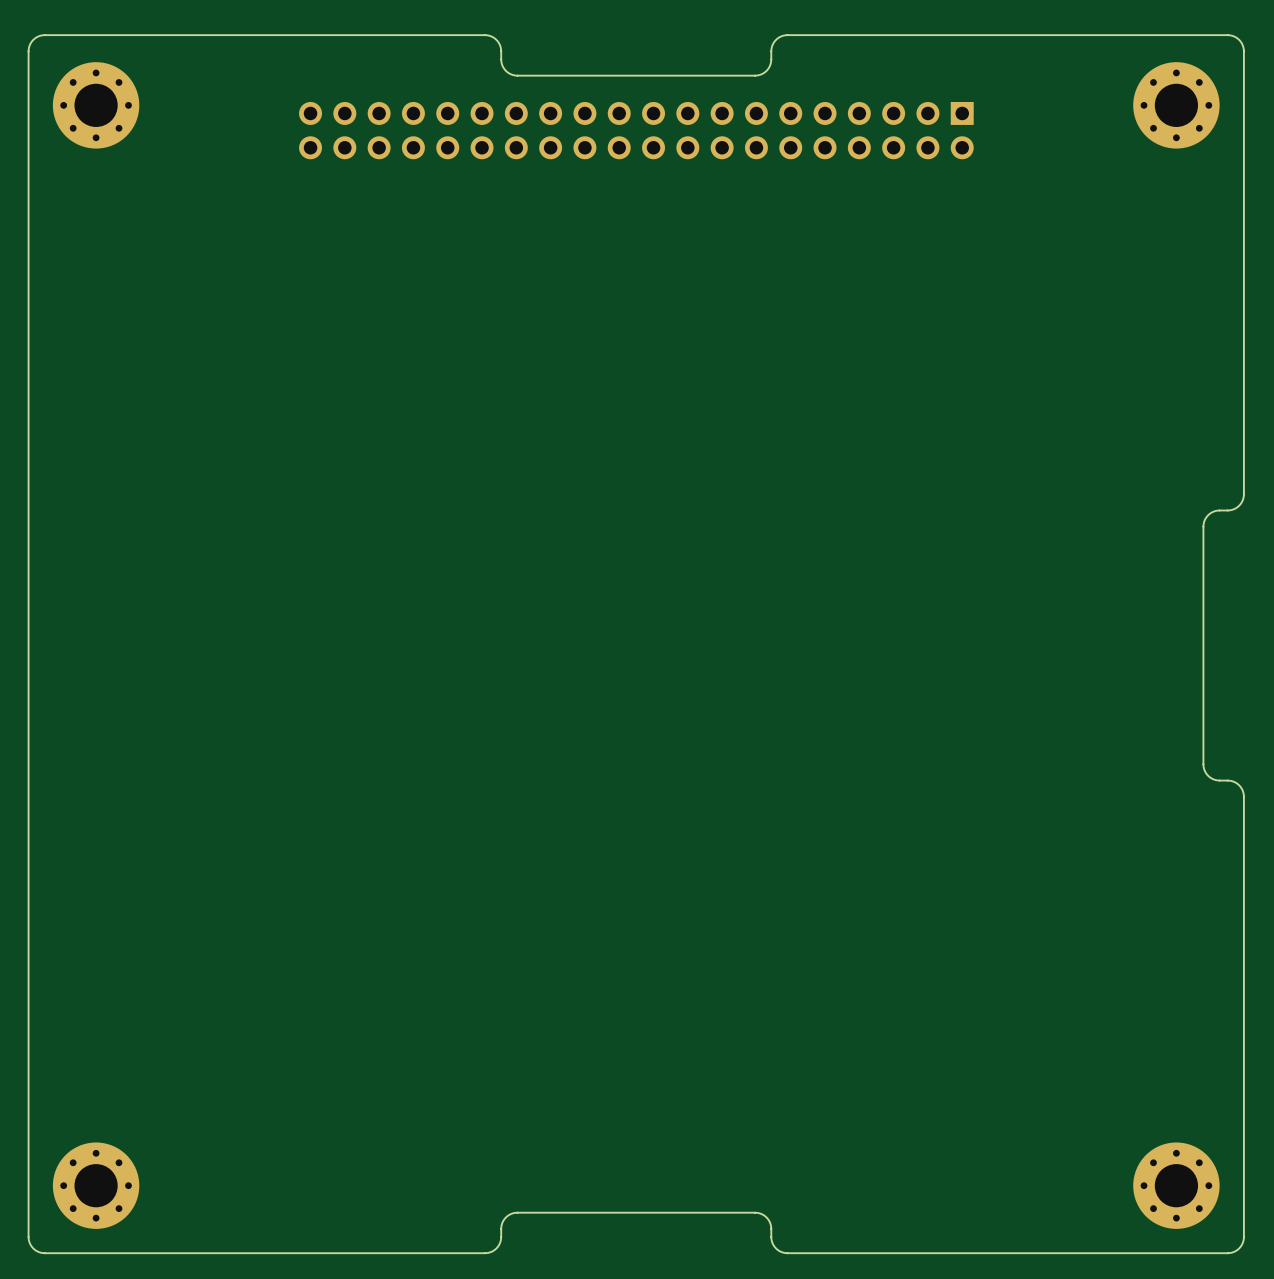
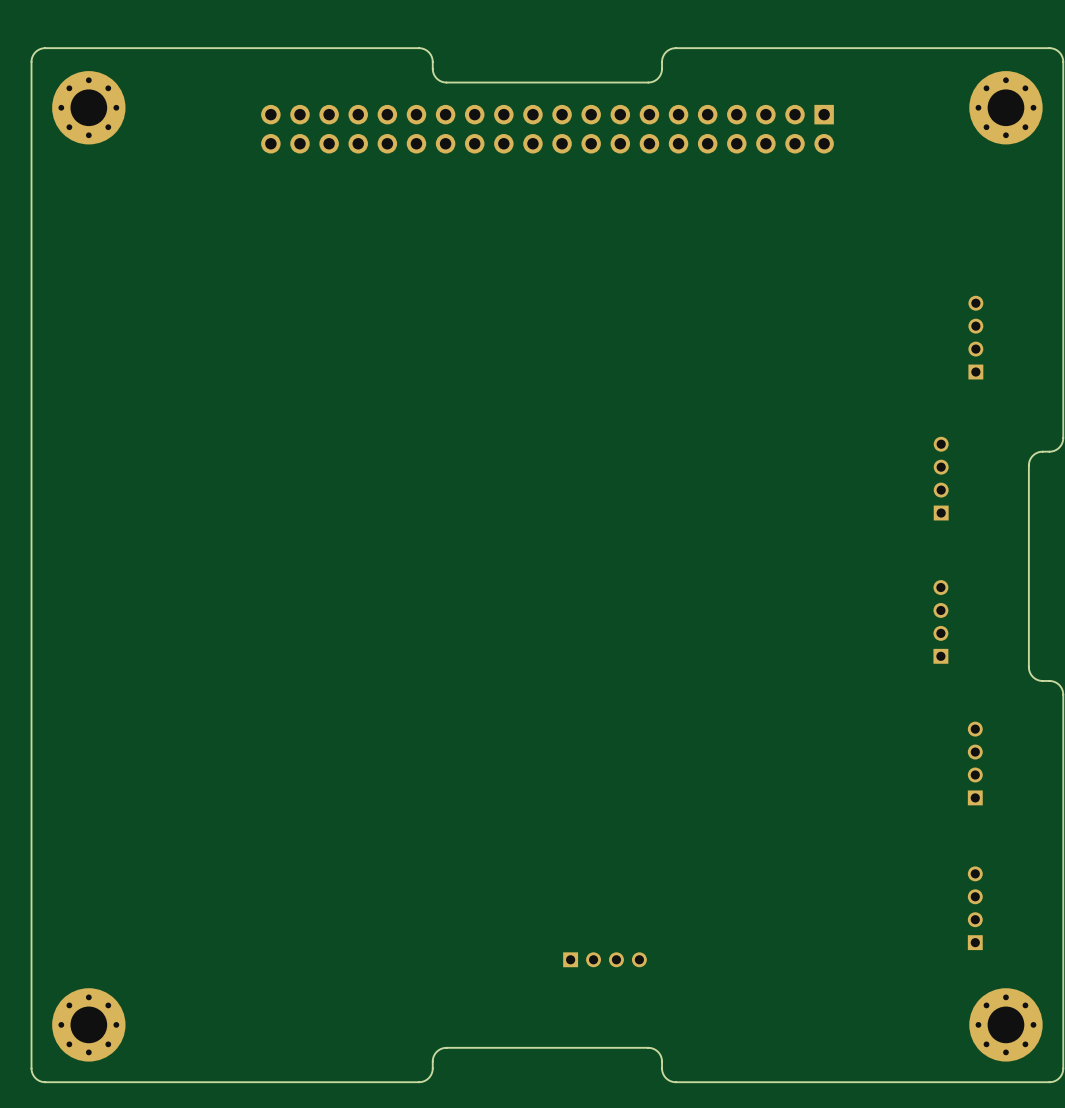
part: none -> (975, 337)
part: none -> (941, 478)
part: none -> (940, 621)
part: none -> (975, 763)
part: none -> (975, 908)
part: none -> (605, 959)

